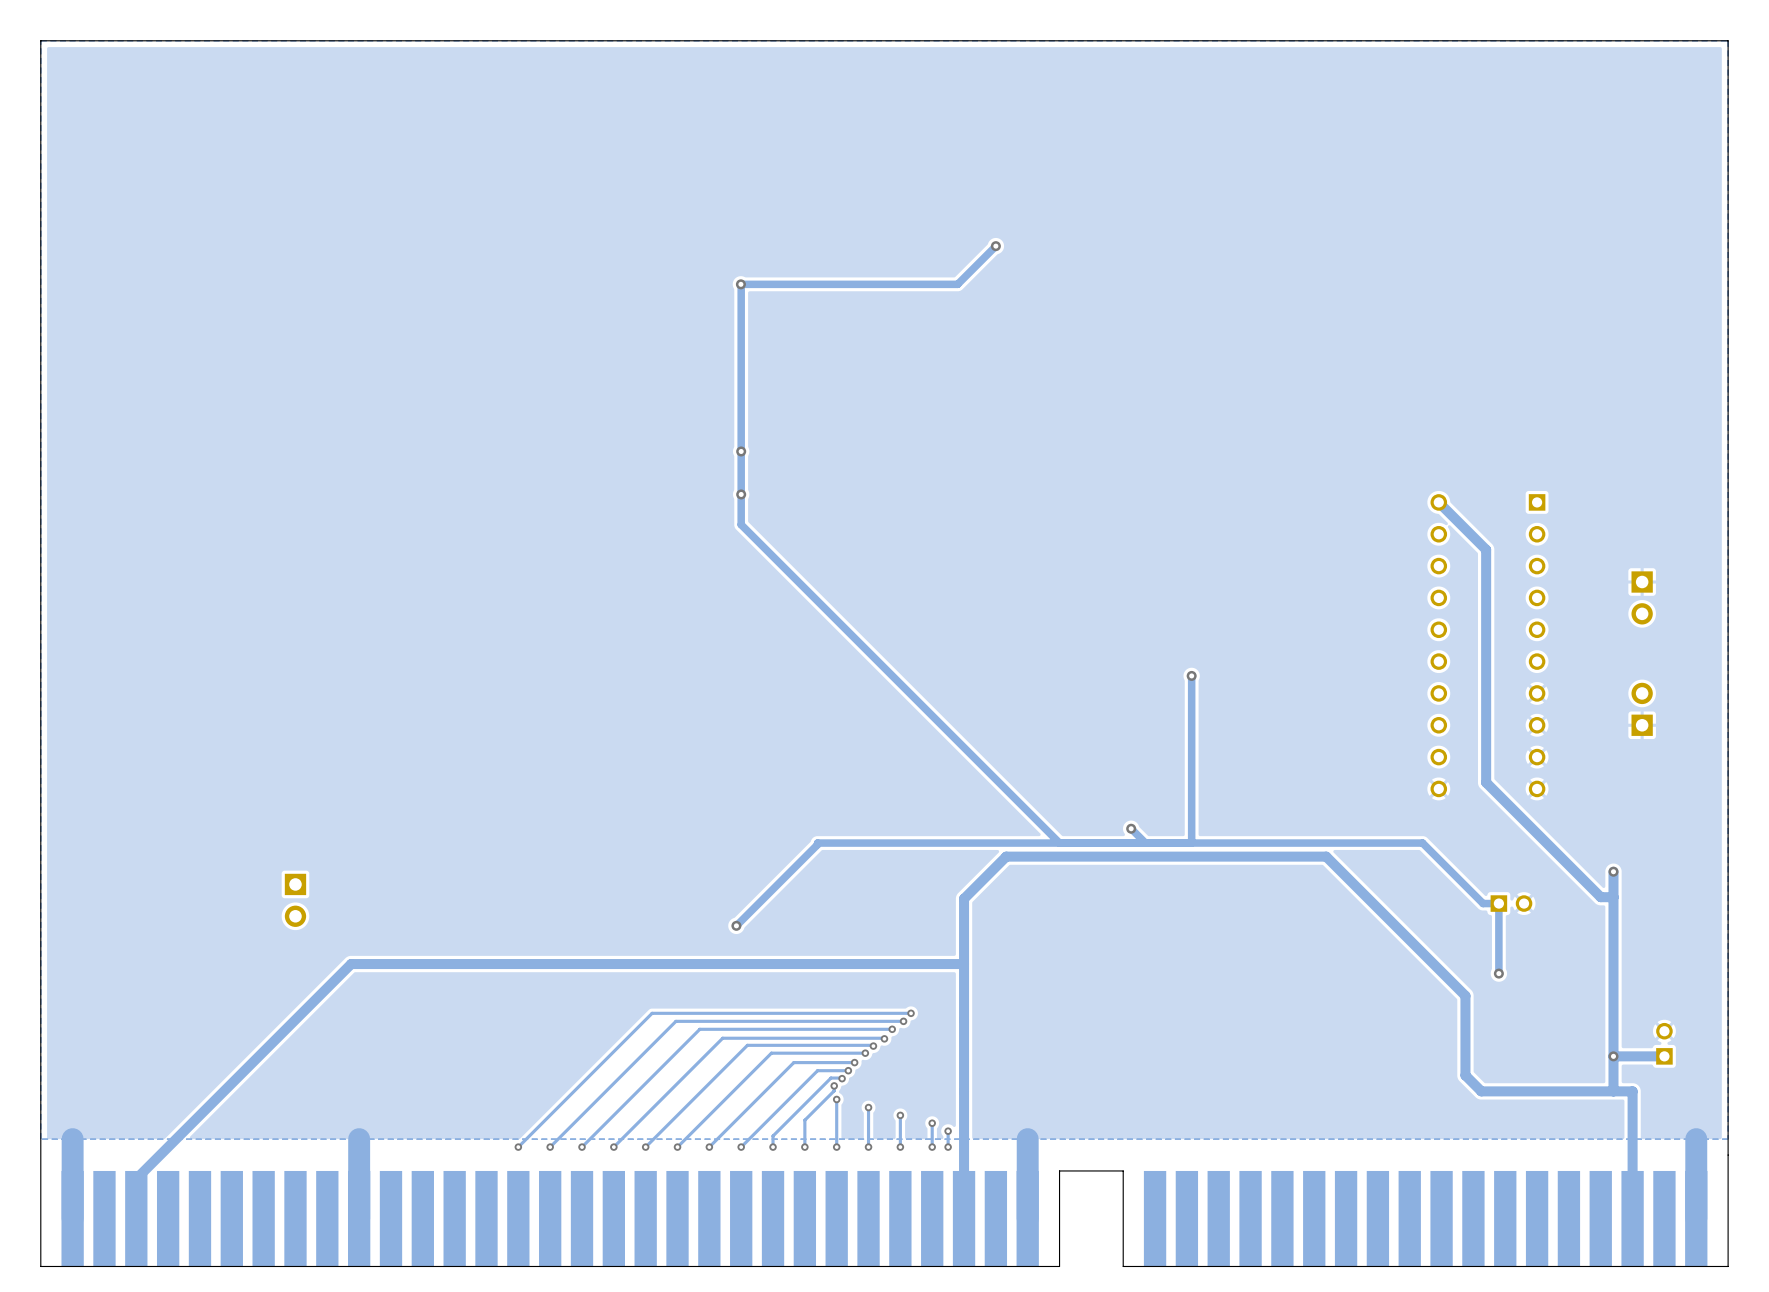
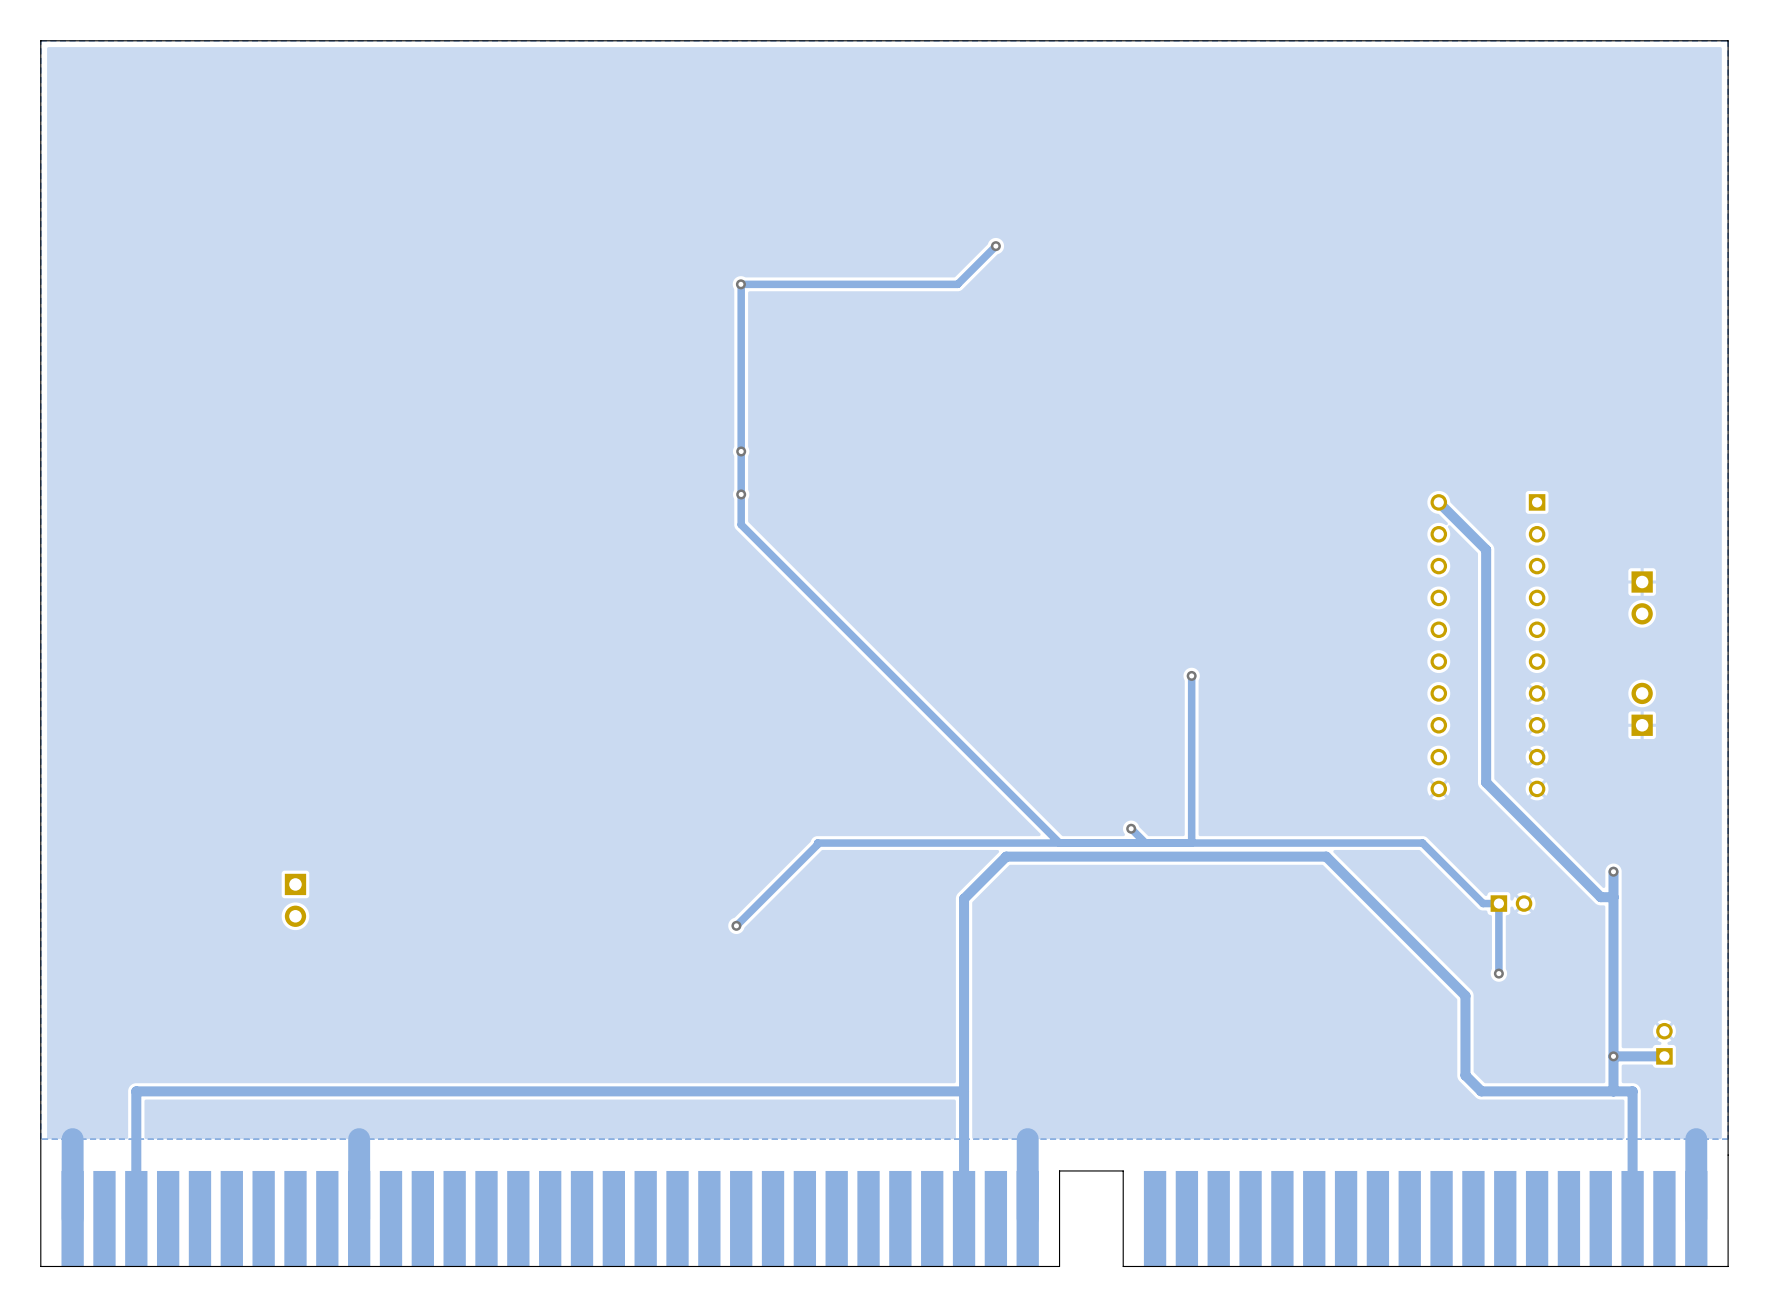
track: (964, 964) (351, 964) (136, 1178) -> (964, 1091) (136, 1091) (136, 1178)
track: (911, 1013) (652, 1013) (518, 1147) -> none
via: (911, 1013) -> none
track: (903, 1021) (675, 1021) (550, 1147) -> none
via: (903, 1021) -> none
track: (892, 1029) (699, 1029) (582, 1147) -> none
via: (892, 1029) -> none
track: (884, 1038) (722, 1038) (613, 1147) -> none
via: (884, 1038) -> none
track: (873, 1046) (747, 1045) (645, 1147) -> none
via: (873, 1046) -> none
track: (865, 1053) (771, 1053) (677, 1147) -> none
via: (865, 1053) -> none
track: (854, 1062) (793, 1062) (709, 1147) -> none
via: (854, 1062) -> none
track: (848, 1070) (817, 1070) (741, 1147) -> none
via: (848, 1070) -> none
track: (842, 1078) (830, 1078) (773, 1136) (773, 1147) -> none
via: (842, 1078) -> none
track: (834, 1085) (834, 1090) (804, 1120) (804, 1147) -> none
via: (834, 1085) -> none
track: (836, 1099) (836, 1147) -> none
via: (836, 1099) -> none
track: (868, 1107) (868, 1147) -> none
via: (868, 1107) -> none
track: (900, 1115) (900, 1147) -> none
via: (900, 1115) -> none
track: (932, 1123) (932, 1147) -> none
via: (932, 1123) -> none
track: (948, 1131) (948, 1147) -> none
via: (948, 1131) -> none
via: (518, 1147) -> none
via: (550, 1147) -> none
via: (582, 1147) -> none
via: (613, 1147) -> none
via: (645, 1147) -> none
via: (677, 1147) -> none
via: (709, 1147) -> none
via: (741, 1147) -> none
via: (773, 1147) -> none
via: (804, 1147) -> none
via: (836, 1147) -> none
via: (868, 1147) -> none
via: (900, 1147) -> none
via: (932, 1147) -> none
via: (948, 1147) -> none

